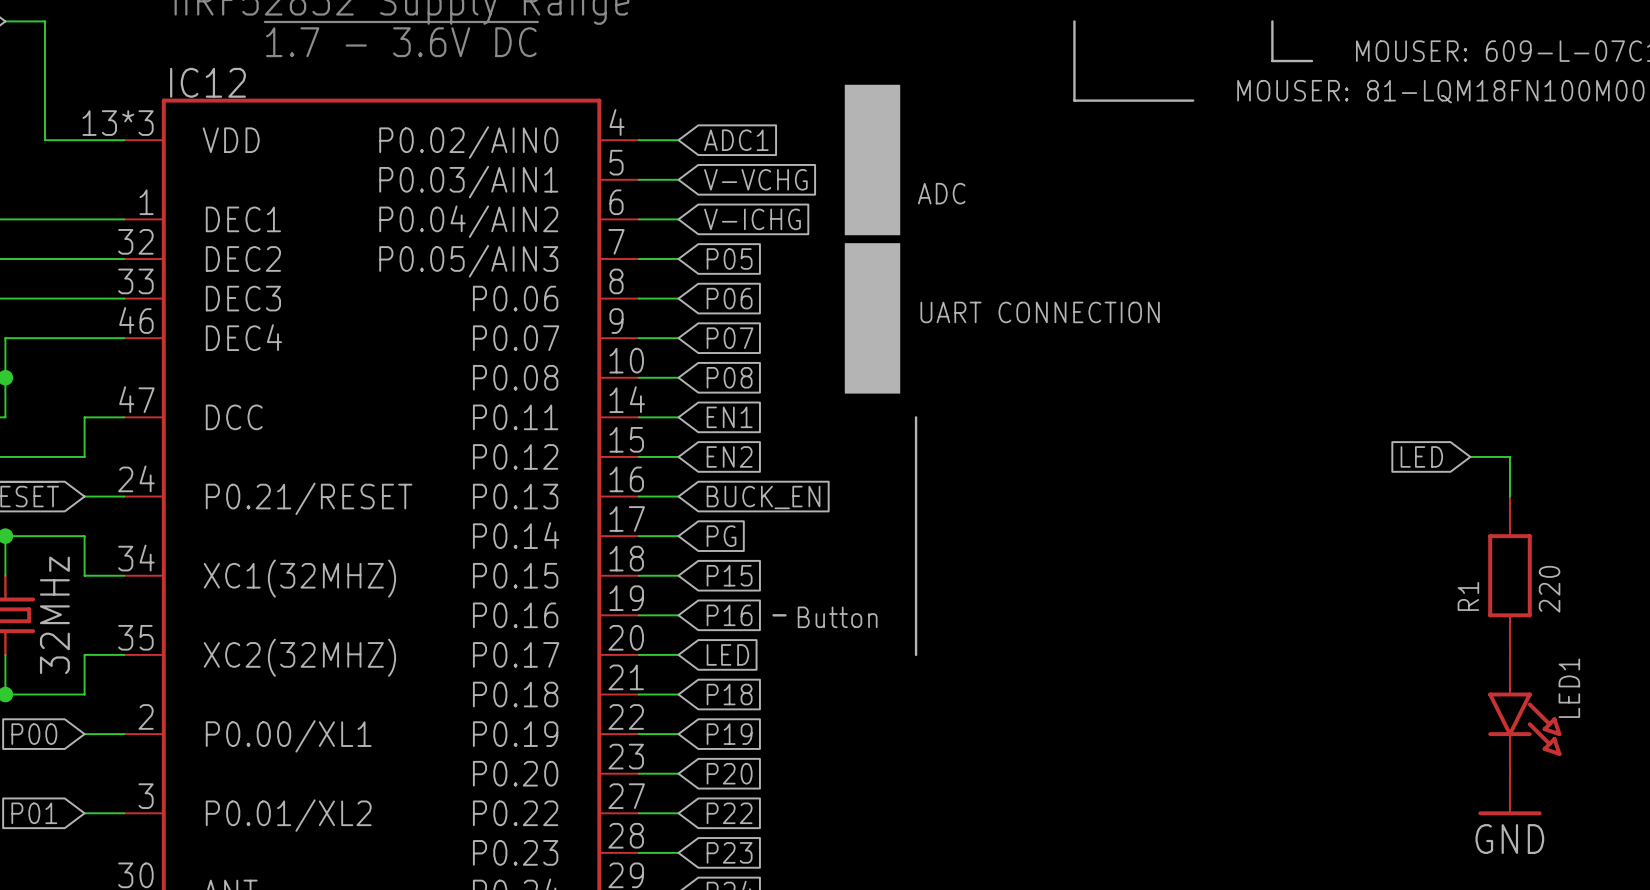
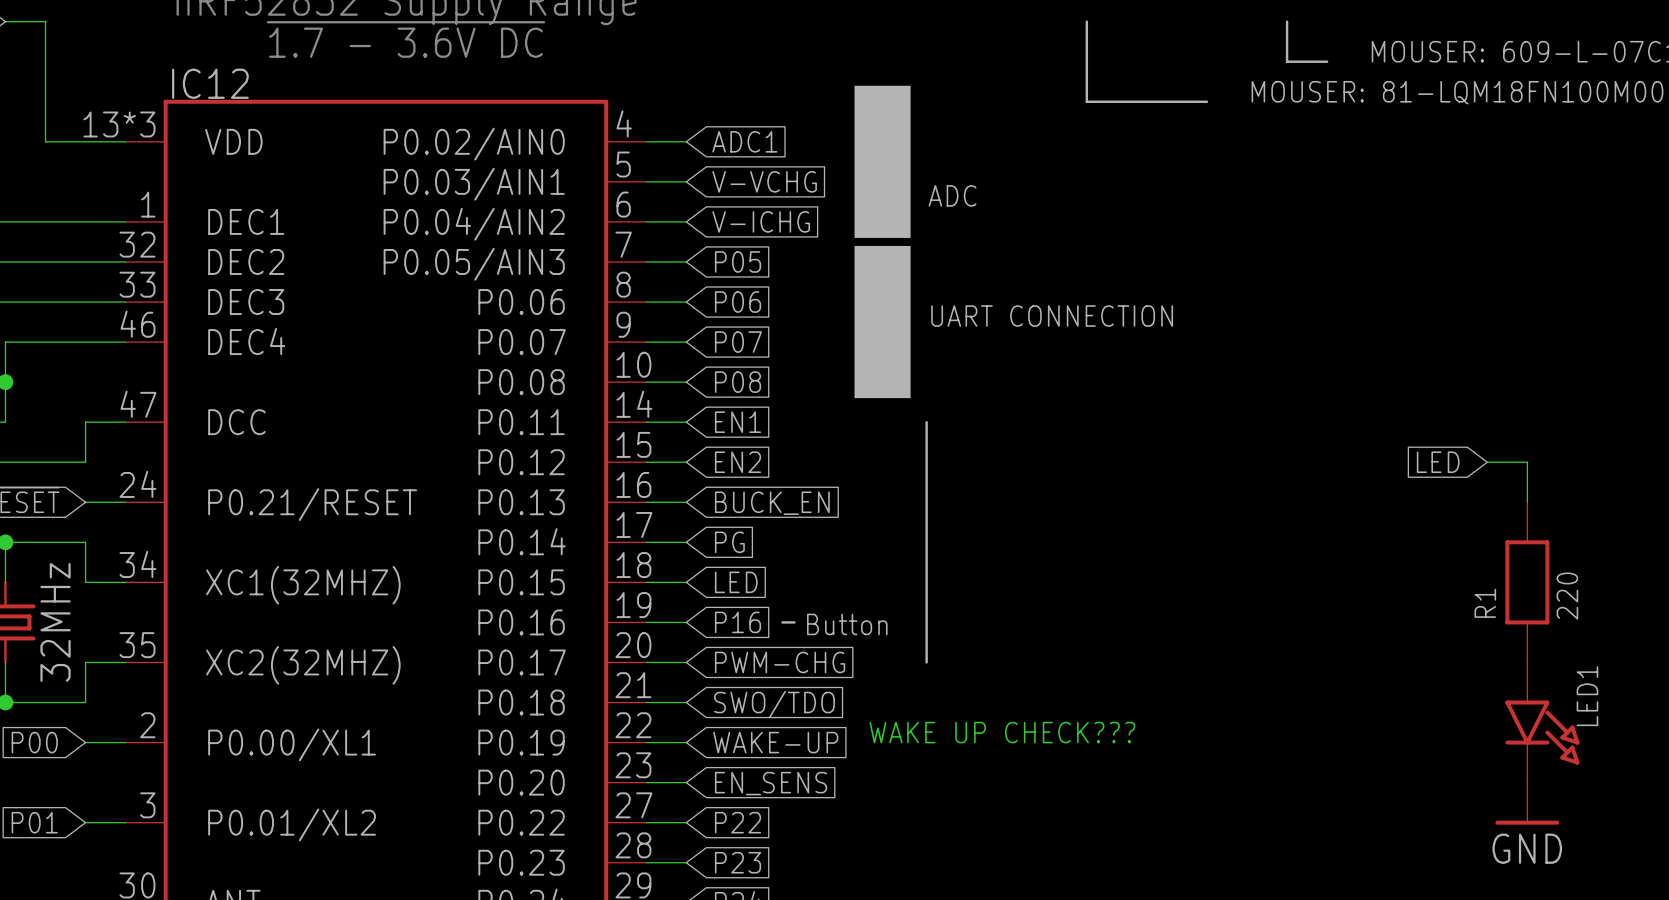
global label: P15 (729, 575) -> LED (736, 582)
global label: LED (727, 654) -> PWM-CHG (780, 662)
global label: P18 (729, 694) -> SWO/TDO (774, 704)
text: none -> WAKE UP CHECK??? (1002, 732)
global label: P19 (729, 734) -> WAKE-UP (775, 742)
global label: P20 (729, 773) -> EN_SENS (771, 783)

